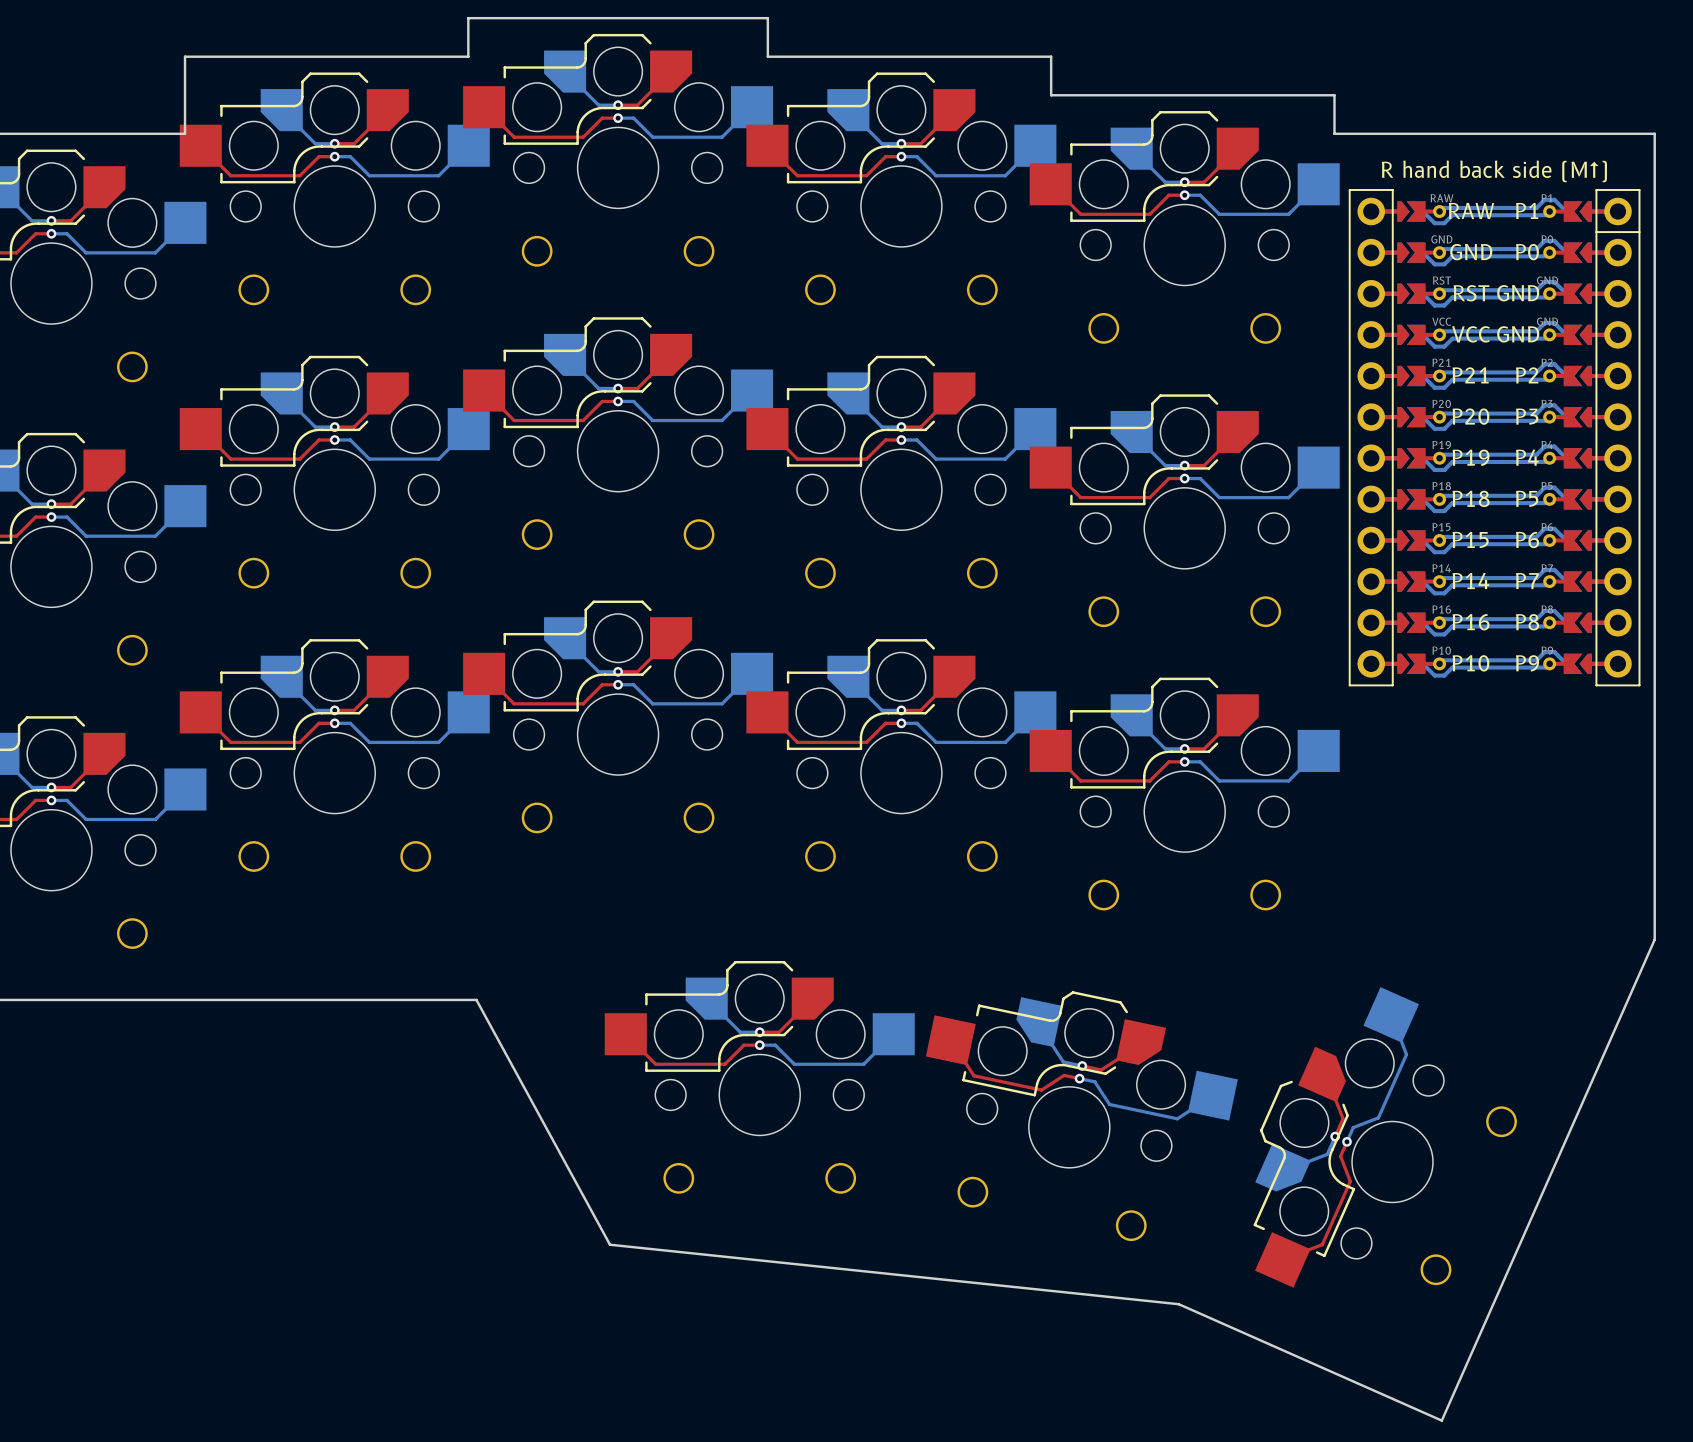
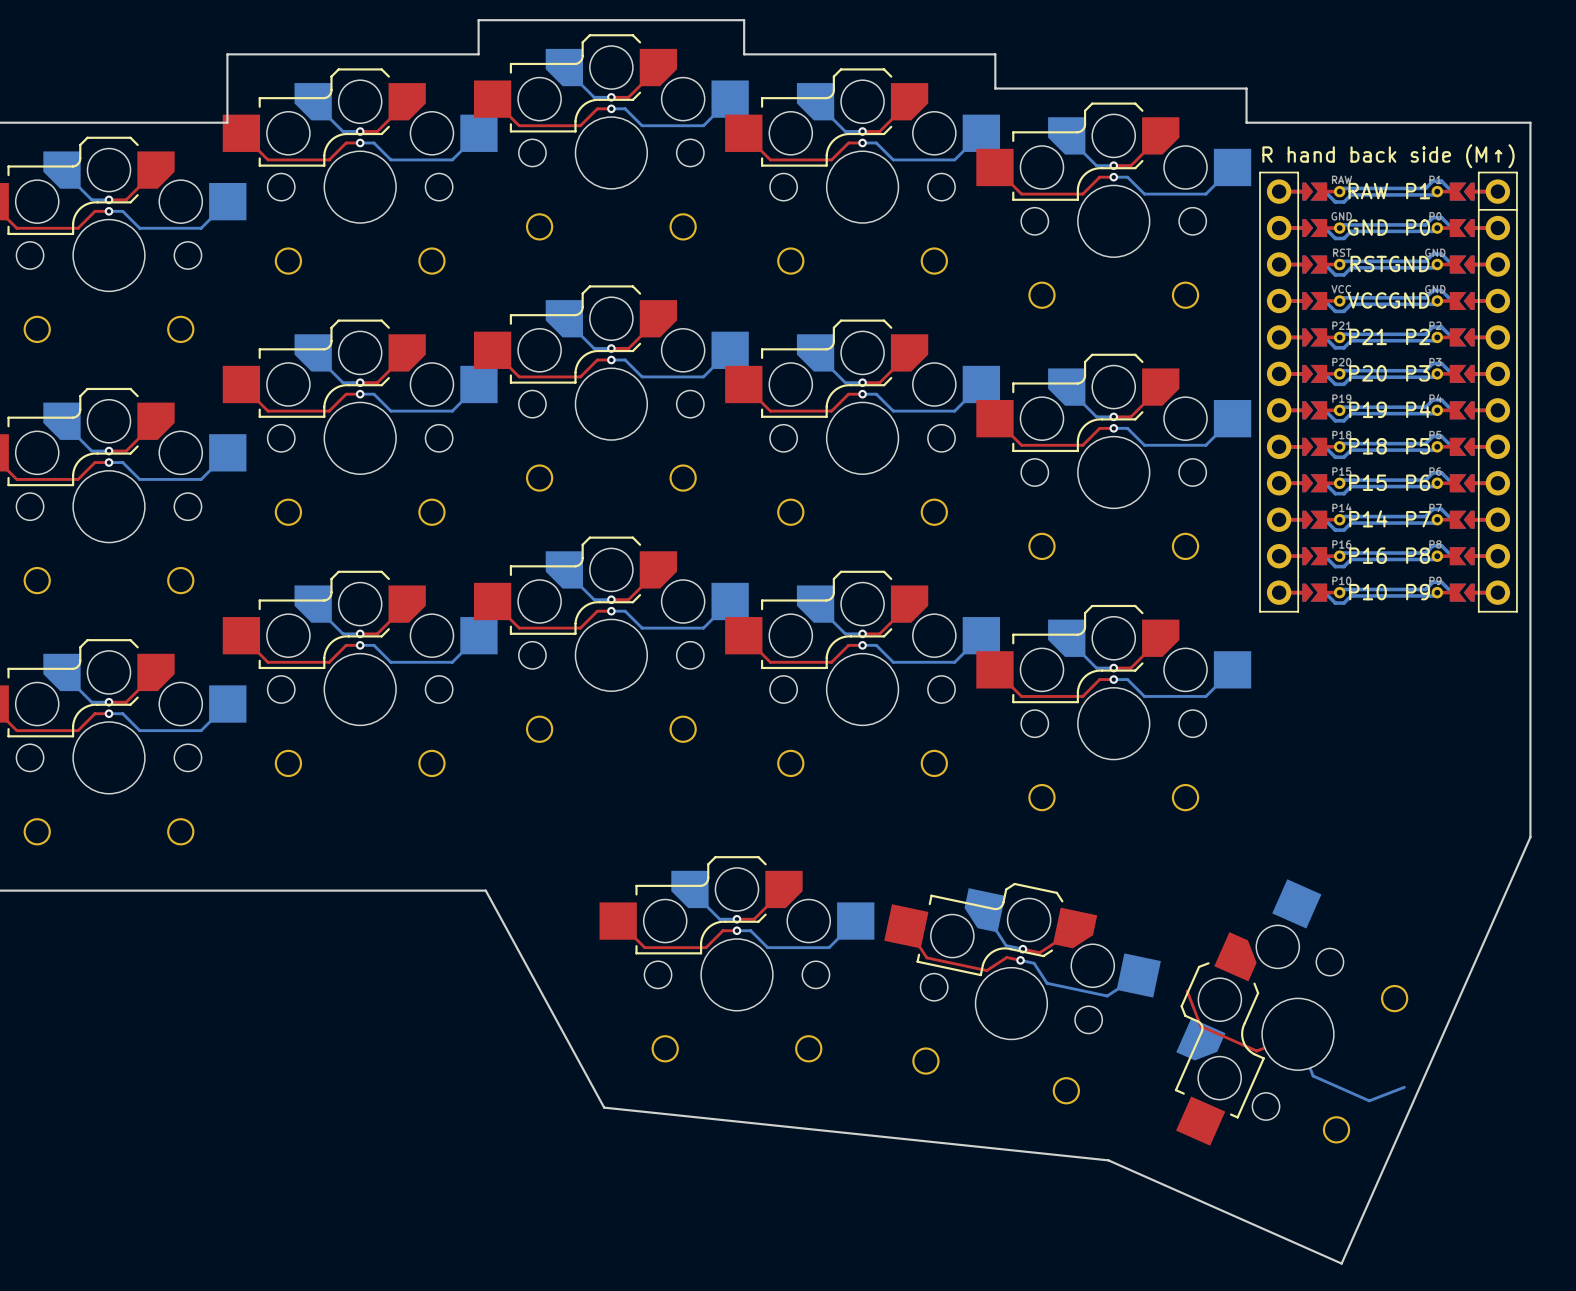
bottom track: (1391, 1014) (1406, 1054) (1378, 1117) (1353, 1127) (1346, 1141) -> none
top track: (1325, 1074) (1343, 1118) (1335, 1136) -> none
top track: none -> (1187, 991) (1200, 1026) (1256, 1051) (1279, 1042) (1291, 1048)
bottom track: (1335, 1136) (1327, 1154) (1282, 1171) -> none
via: (1335, 1136) -> none
top track: (1346, 1141) (1340, 1156) (1350, 1181) (1322, 1244) (1282, 1259) -> none
via: (1346, 1141) -> none
bottom track: none -> (1291, 1048) (1304, 1053) (1313, 1075) (1369, 1100) (1404, 1087)

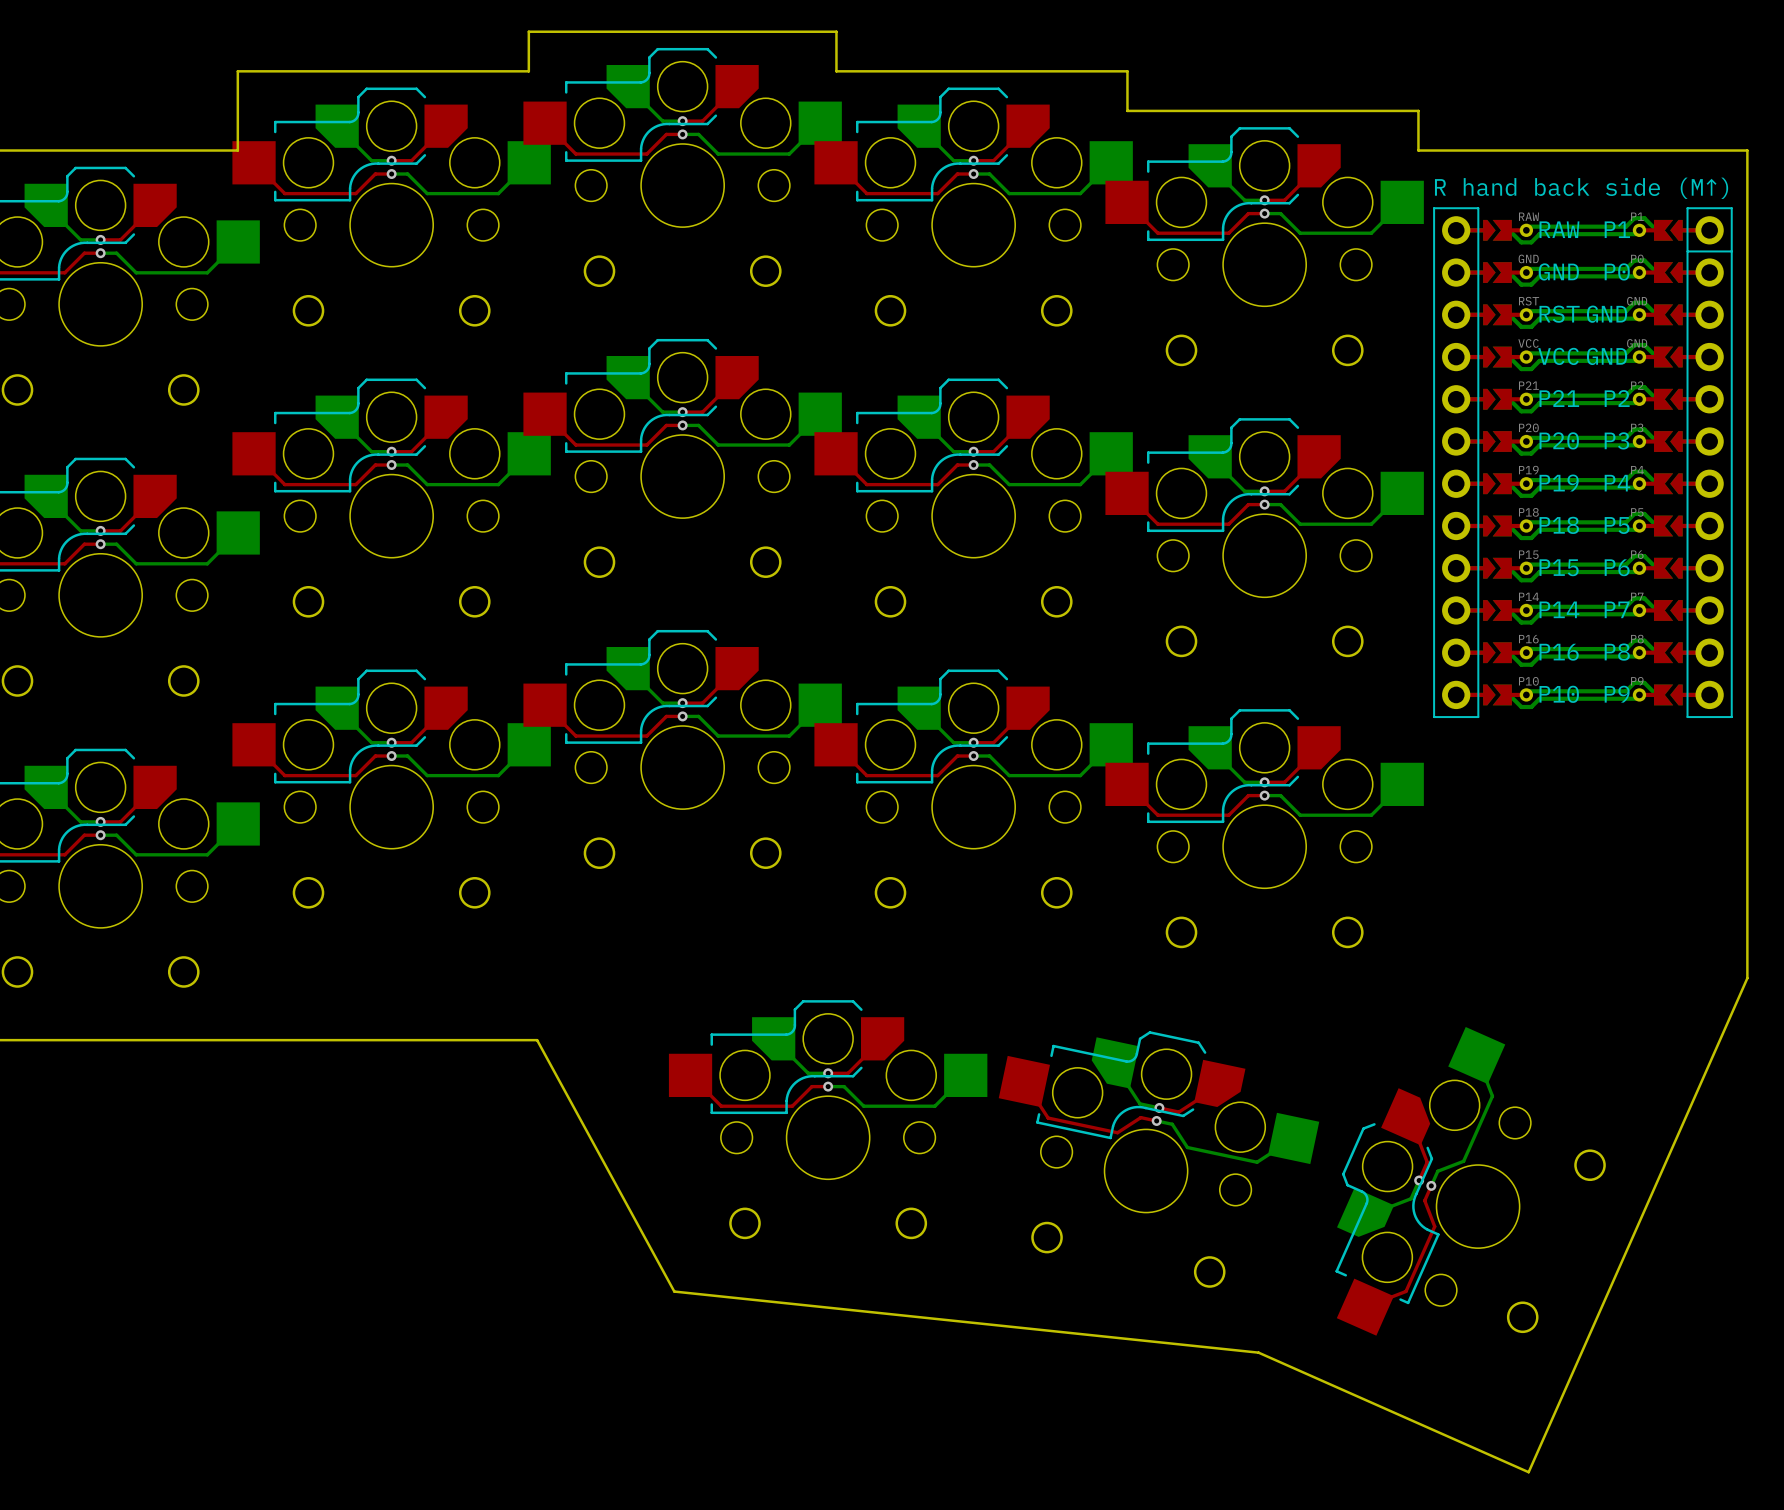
bottom track: none -> (1476, 1055) (1492, 1096) (1463, 1161) (1437, 1171) (1431, 1185)
top track: none -> (1409, 1116) (1427, 1162) (1419, 1180)
top track: (1187, 991) (1200, 1026) (1256, 1051) (1279, 1042) (1291, 1048) -> none
bottom track: none -> (1419, 1180) (1411, 1198) (1365, 1216)
via: none -> (1419, 1180)
top track: none -> (1431, 1185) (1424, 1200) (1434, 1226) (1406, 1291) (1365, 1307)
via: none -> (1431, 1185)
bottom track: (1291, 1048) (1304, 1053) (1313, 1075) (1369, 1100) (1404, 1087) -> none

